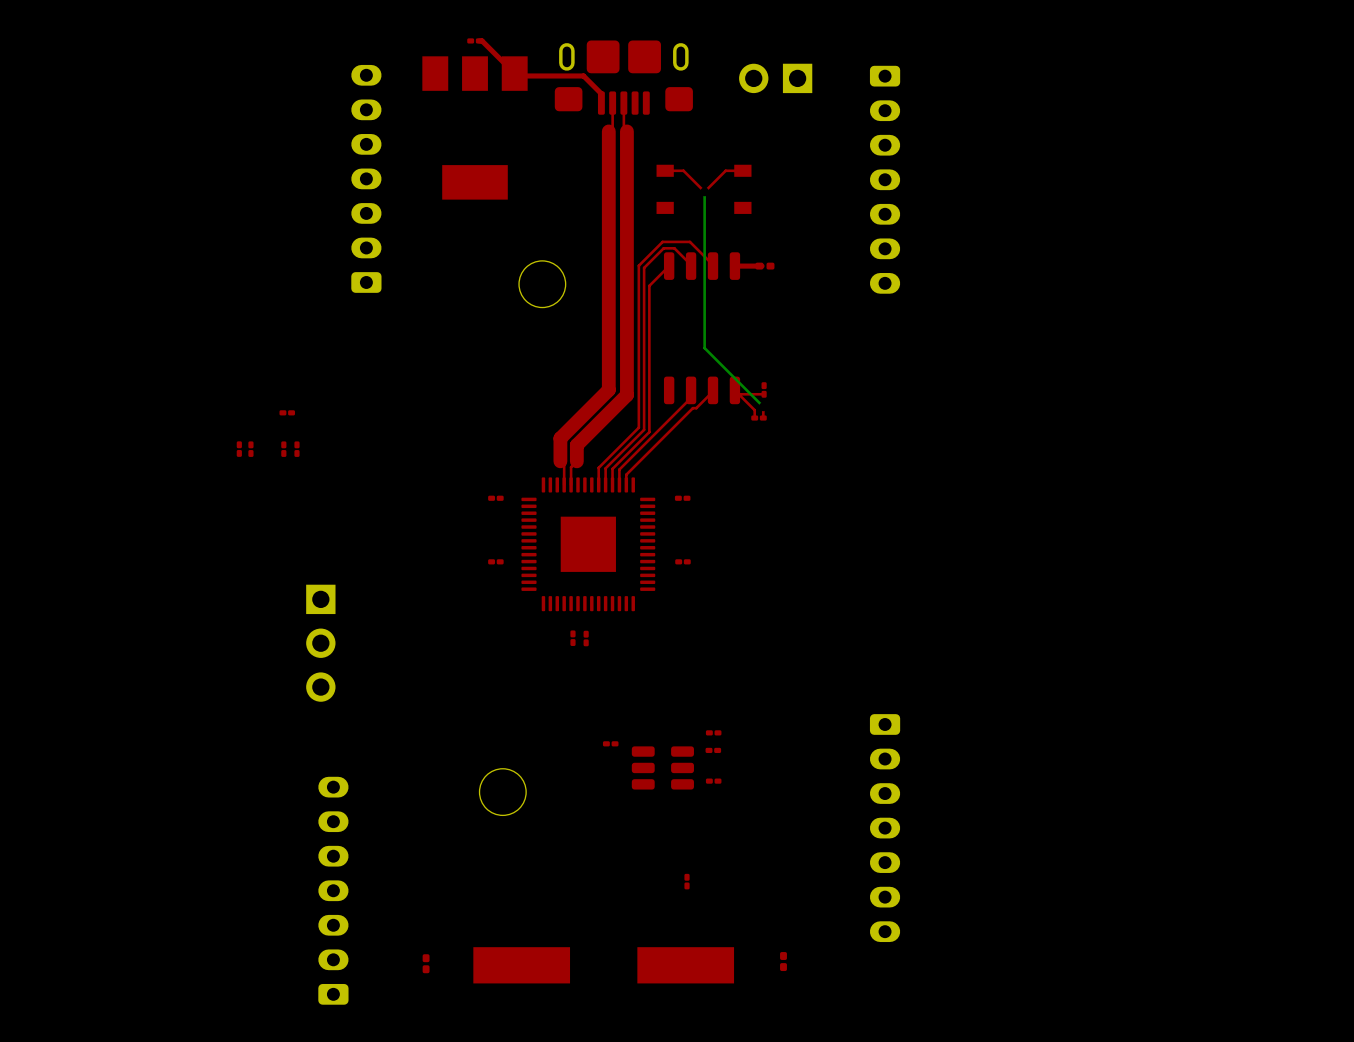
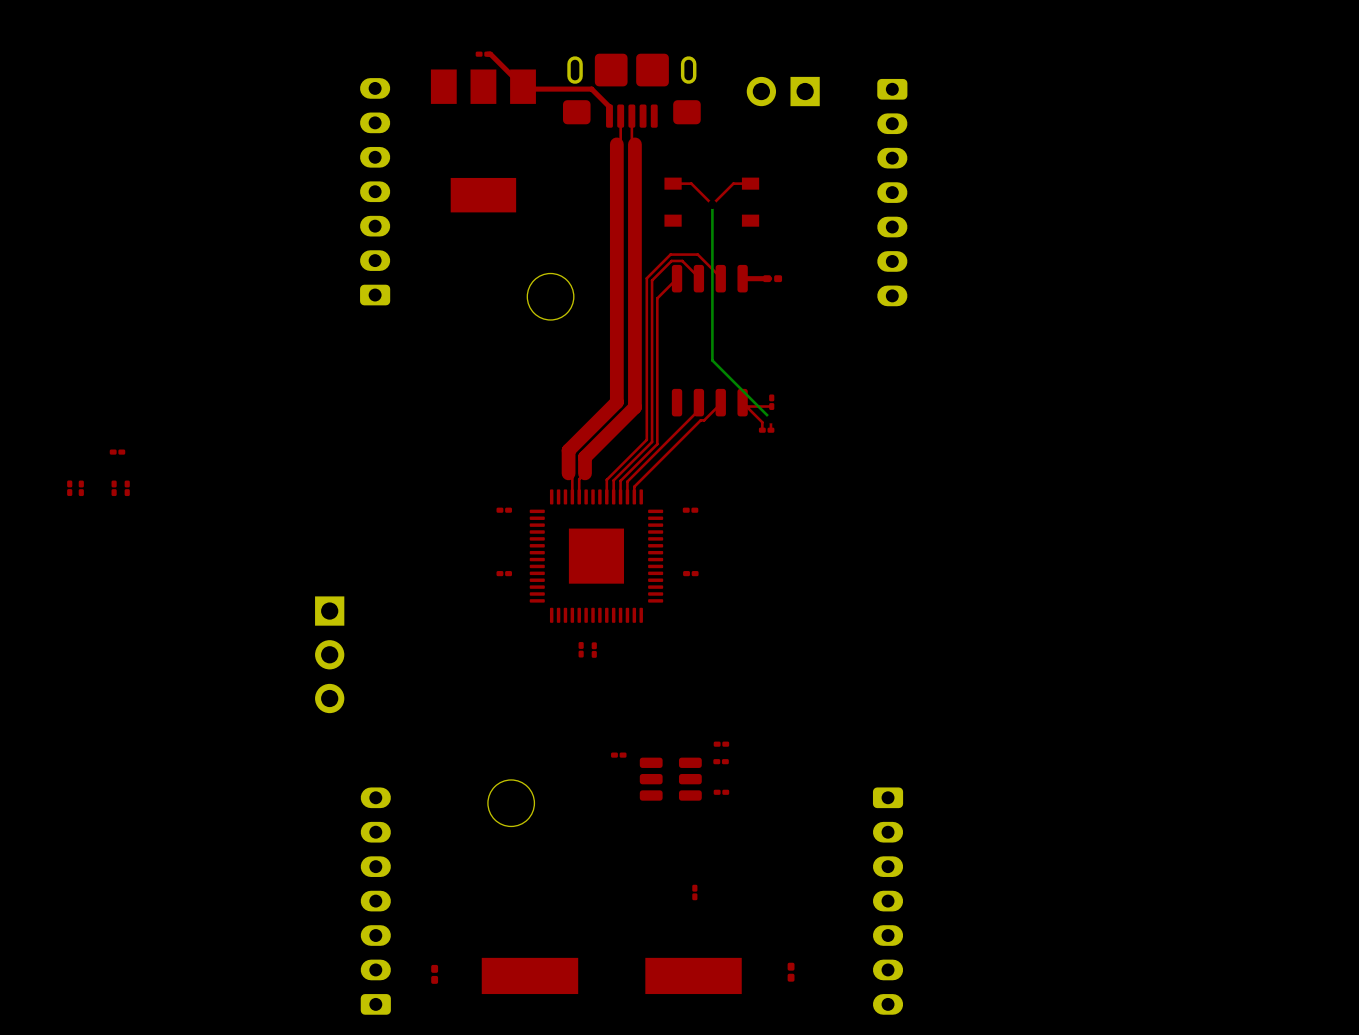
part: (287, 412) -> none
part: none -> (117, 452)
part: (239, 449) -> none
part: (250, 449) -> none
part: (283, 449) -> none
part: (296, 449) -> none
part: none -> (69, 488)
part: none -> (81, 488)
part: none -> (114, 488)
part: none -> (127, 488)
part position: (885, 828) -> (888, 901)
part position: (333, 890) -> (375, 901)

